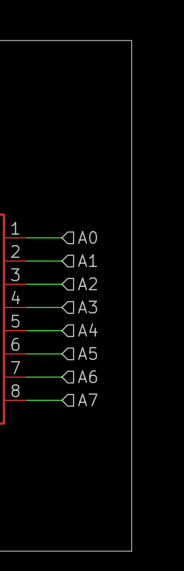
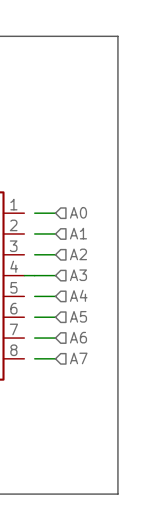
wire: (27, 237) (38, 237) -> none
wire: (27, 261) (38, 261) -> none
wire: (27, 284) (38, 284) -> none
wire: (27, 330) (38, 330) -> none
wire: (27, 353) (38, 353) -> none
wire: (27, 377) (38, 377) -> none
wire: (27, 400) (38, 400) -> none

